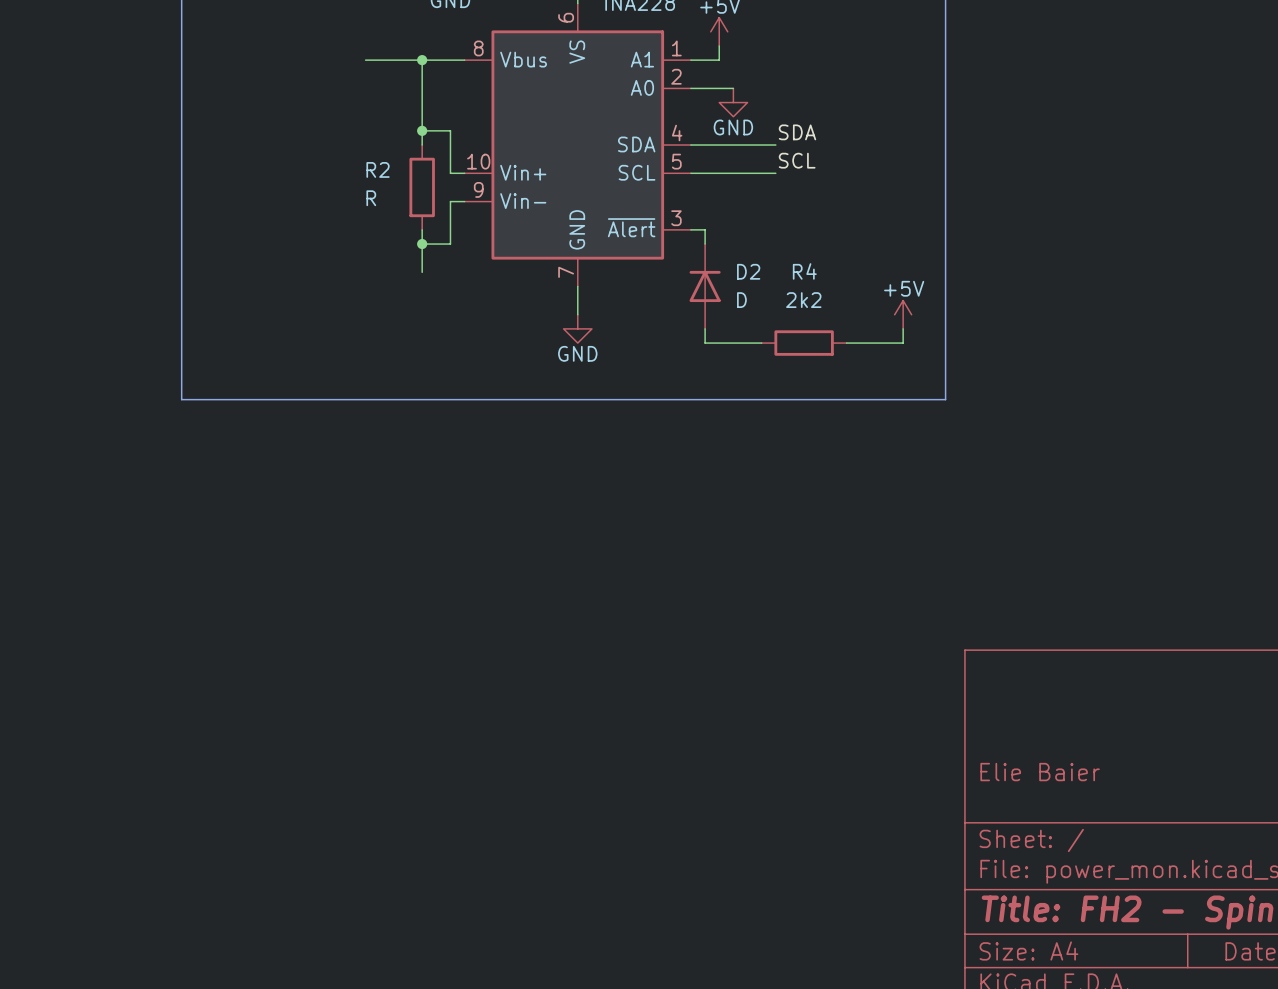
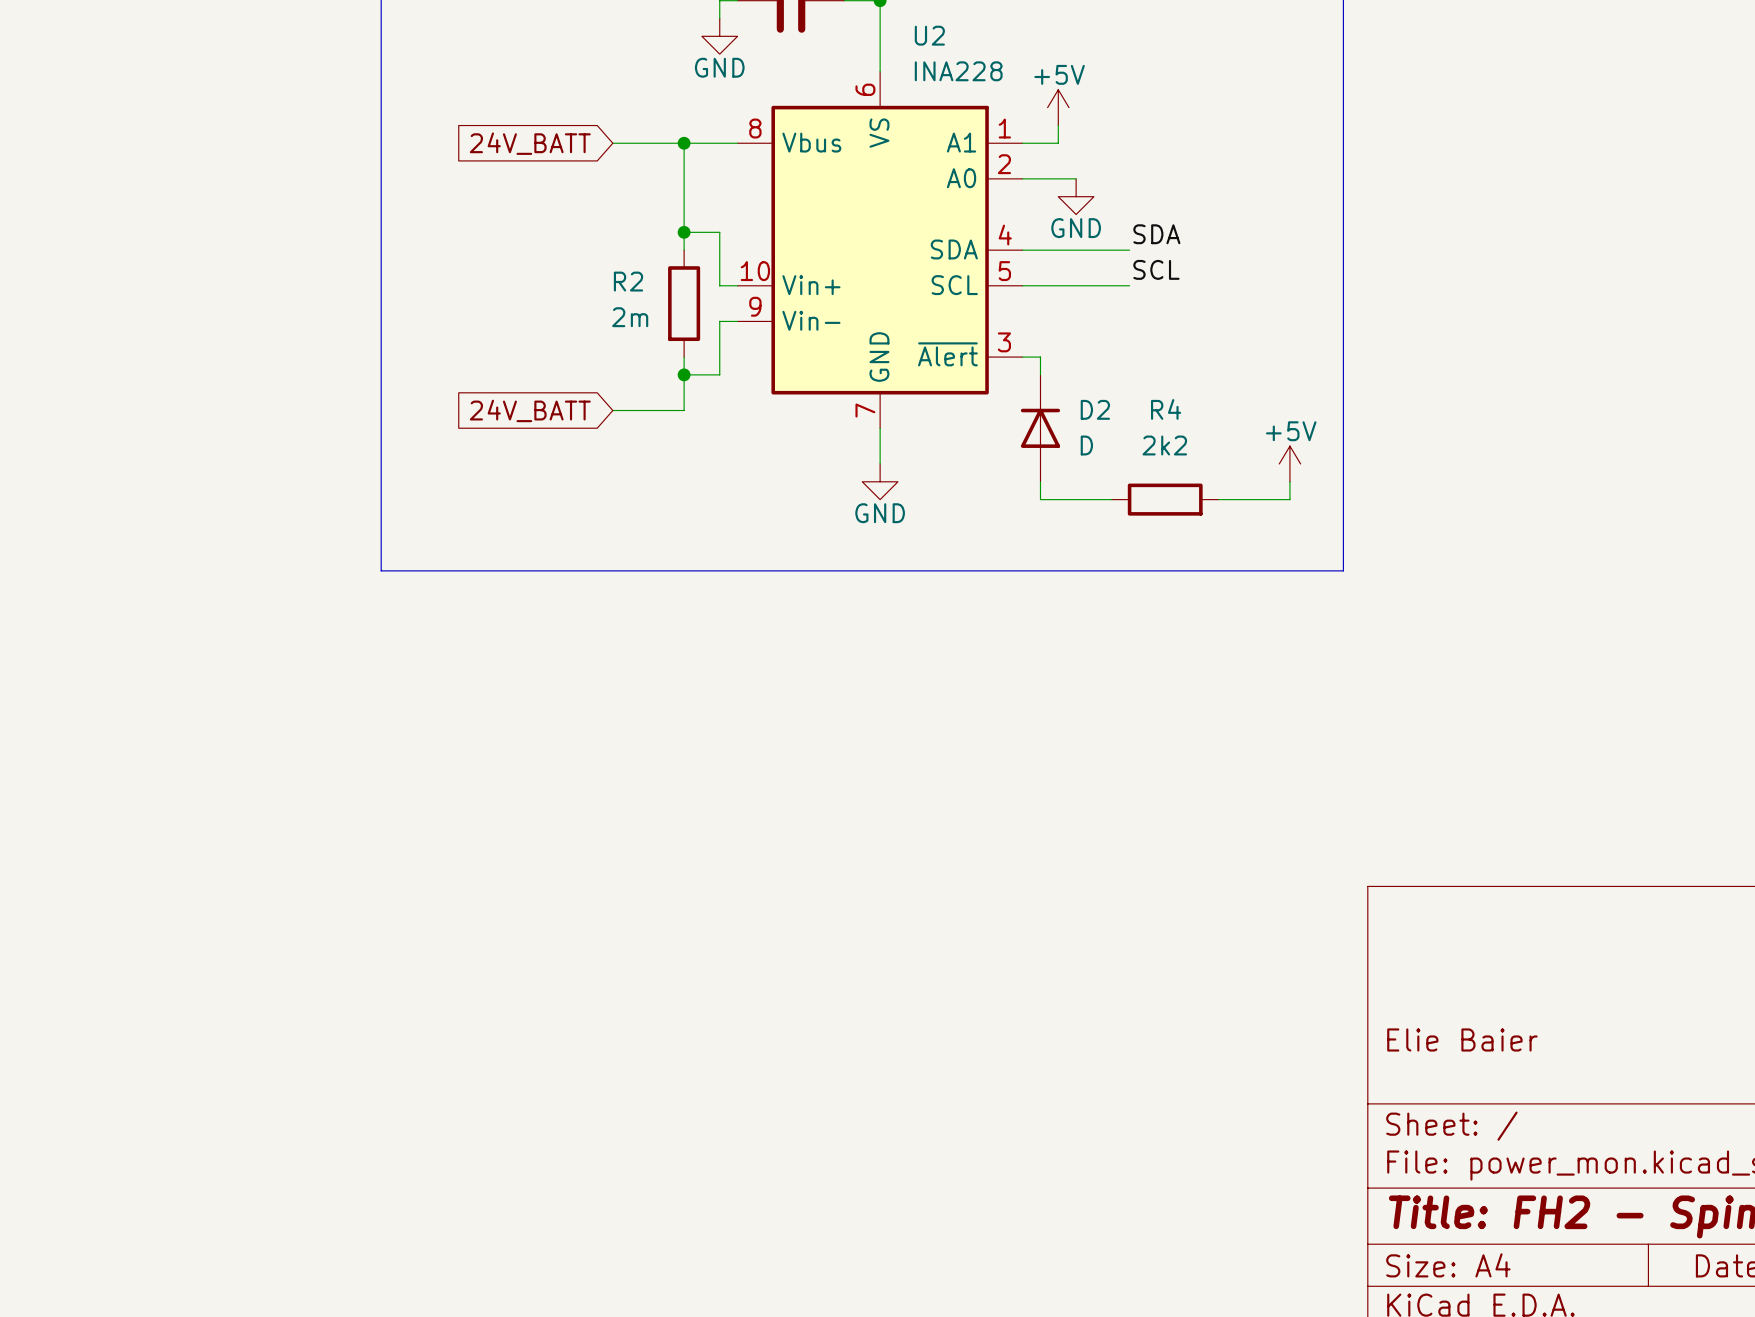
global label: none -> 24V_BATT (530, 143)
R2 value: R (371, 198) -> 2m (630, 317)
global label: none -> 24V_BATT (530, 410)
wire: none -> (612, 410) (684, 410)

